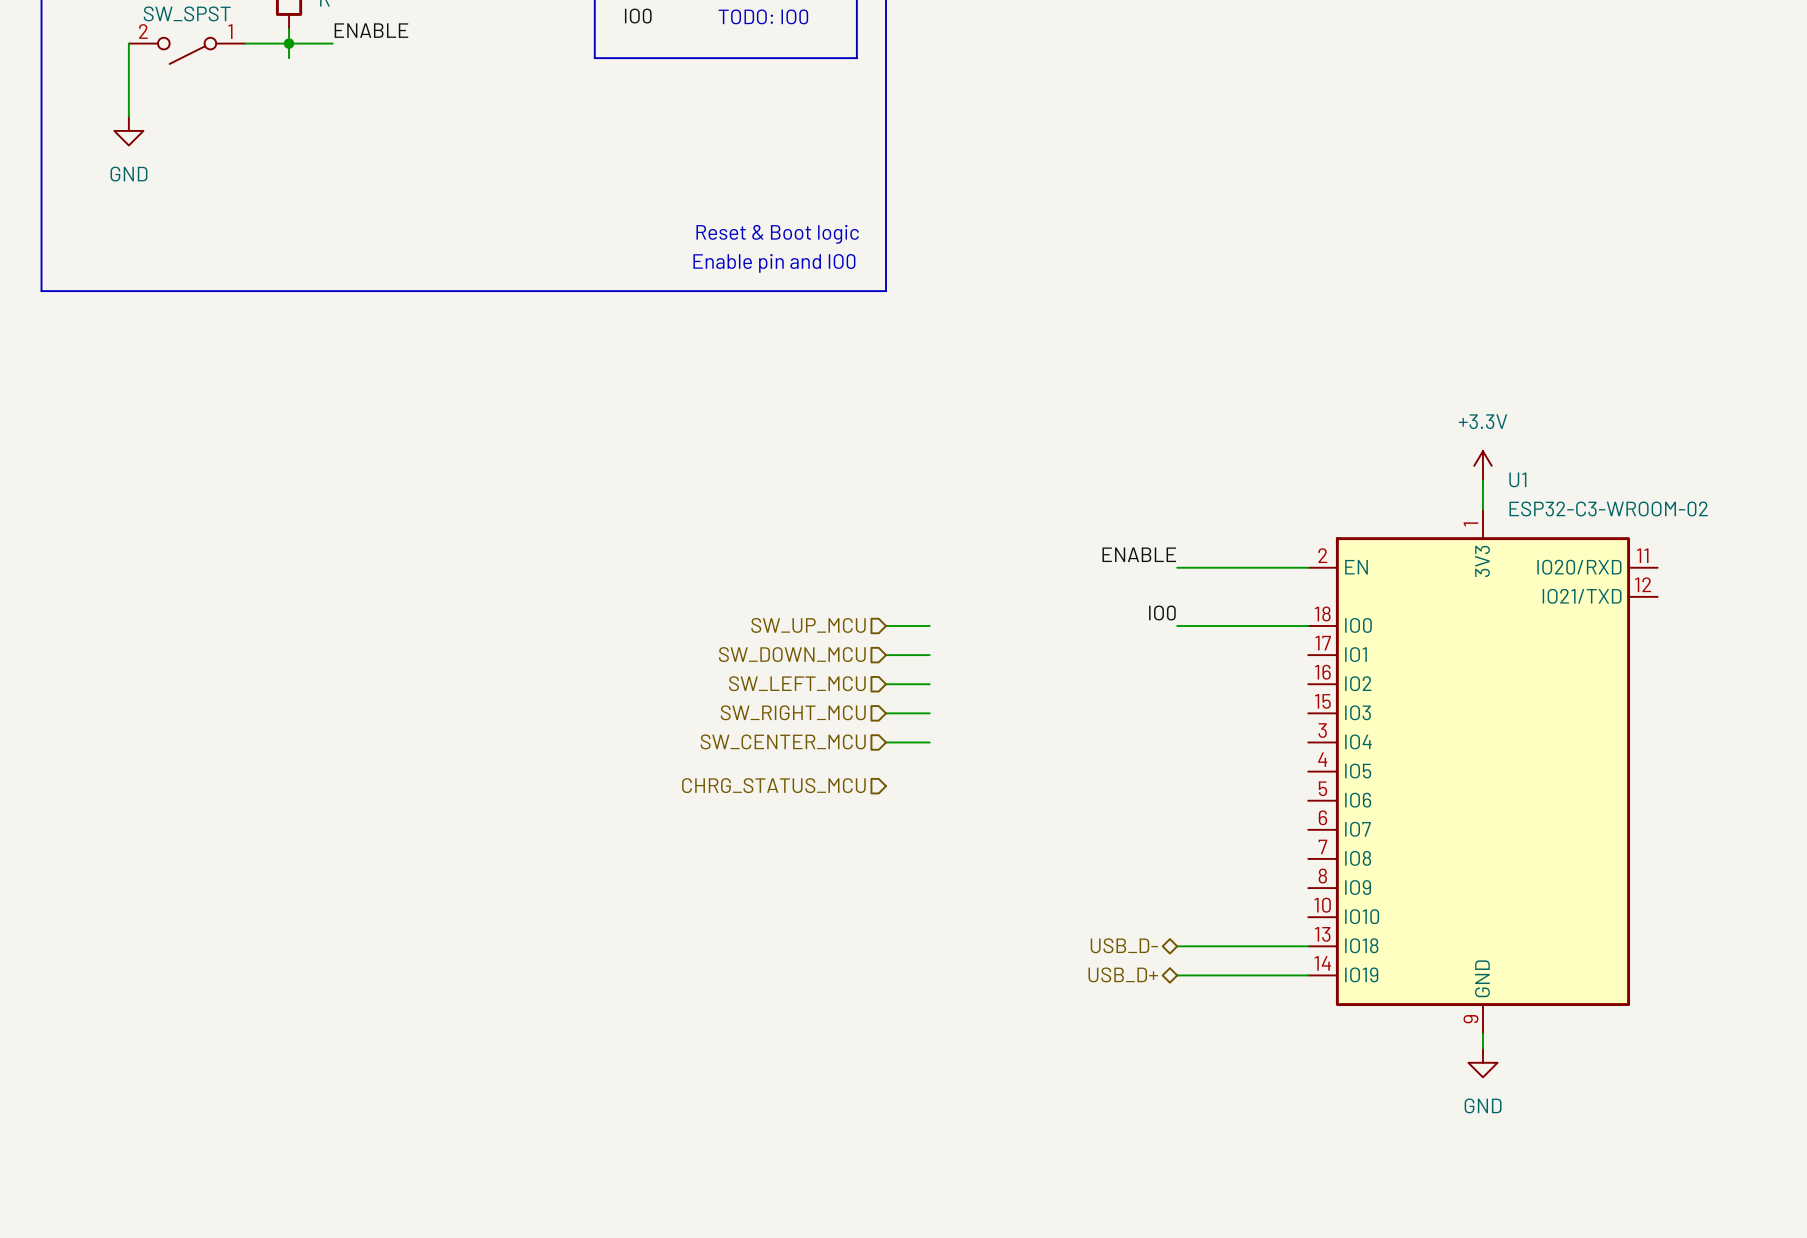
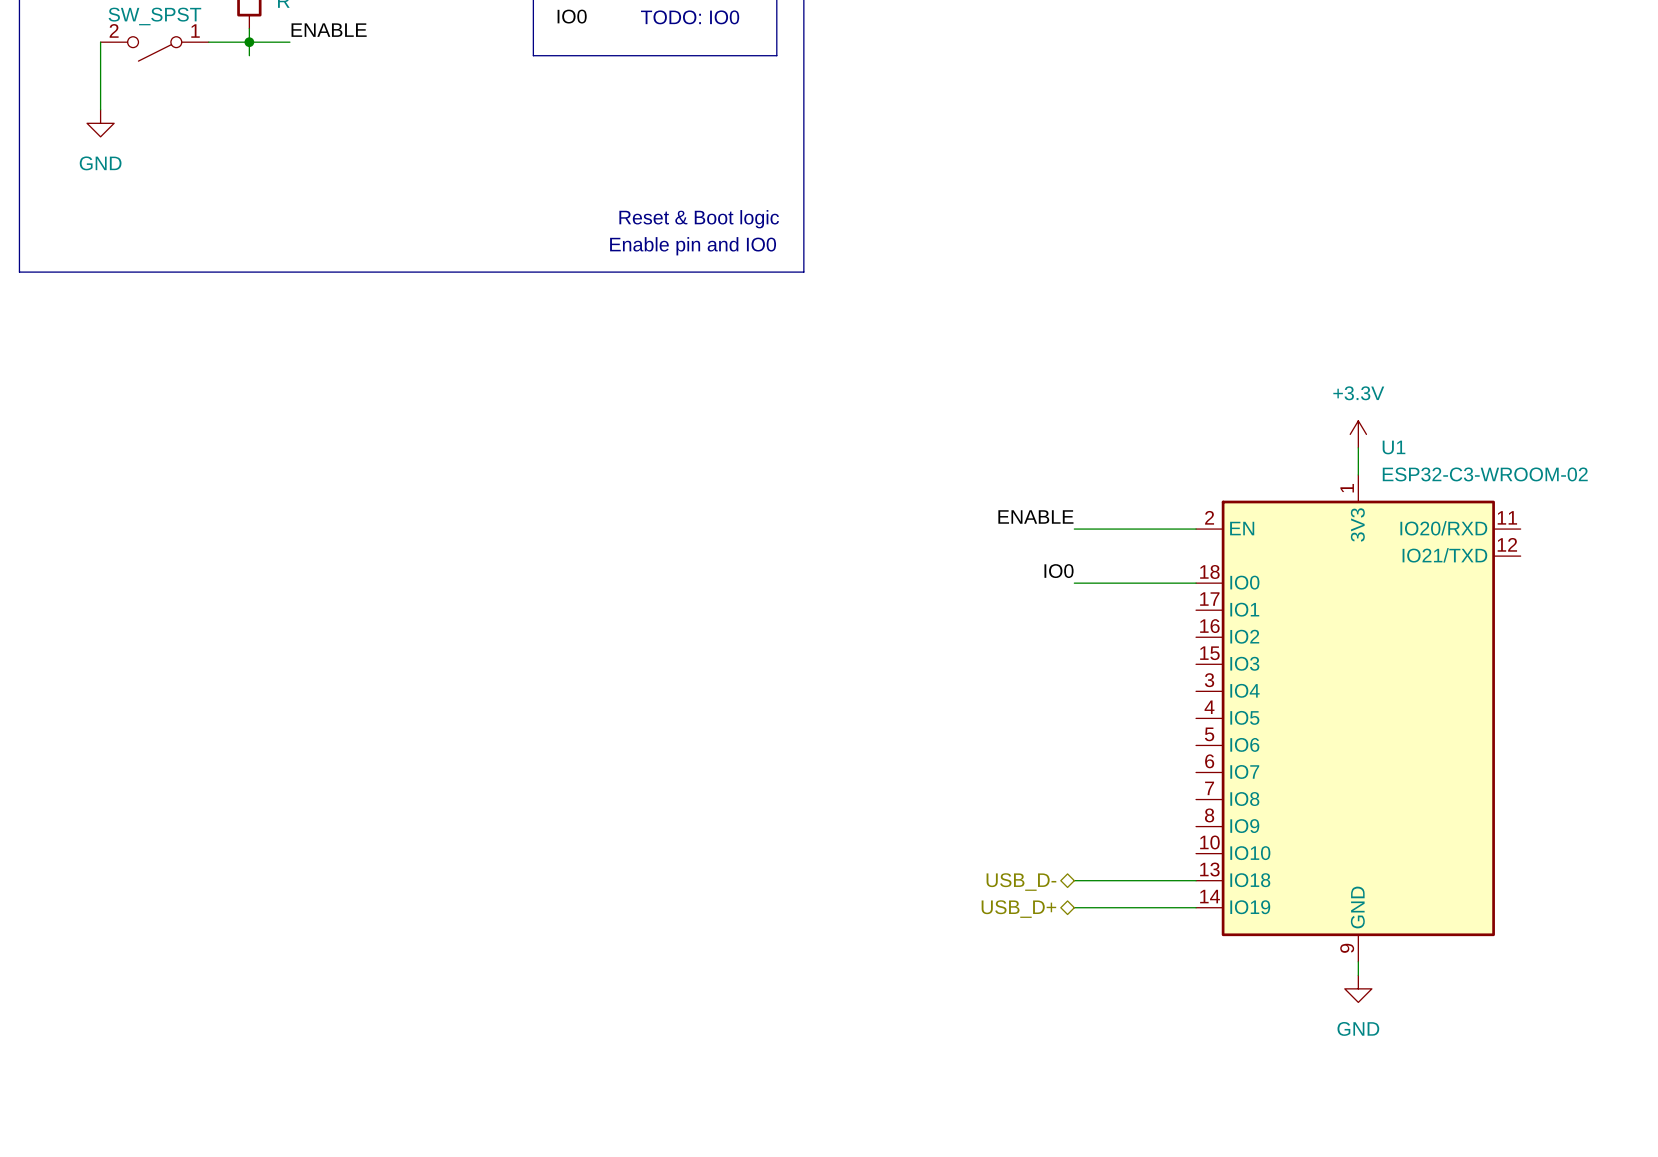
hierarchical label: SW_UP_MCU (808, 625) -> none
wire: (886, 625) (929, 625) -> none
hierarchical label: SW_DOWN_MCU (792, 654) -> none
wire: (886, 655) (929, 655) -> none
hierarchical label: SW_LEFT_MCU (797, 683) -> none
wire: (886, 684) (929, 684) -> none
hierarchical label: SW_RIGHT_MCU (793, 712) -> none
wire: (886, 713) (929, 713) -> none
hierarchical label: SW_CENTER_MCU (783, 741) -> none
wire: (886, 742) (929, 742) -> none
hierarchical label: CHRG_STATUS_MCU (773, 785) -> none

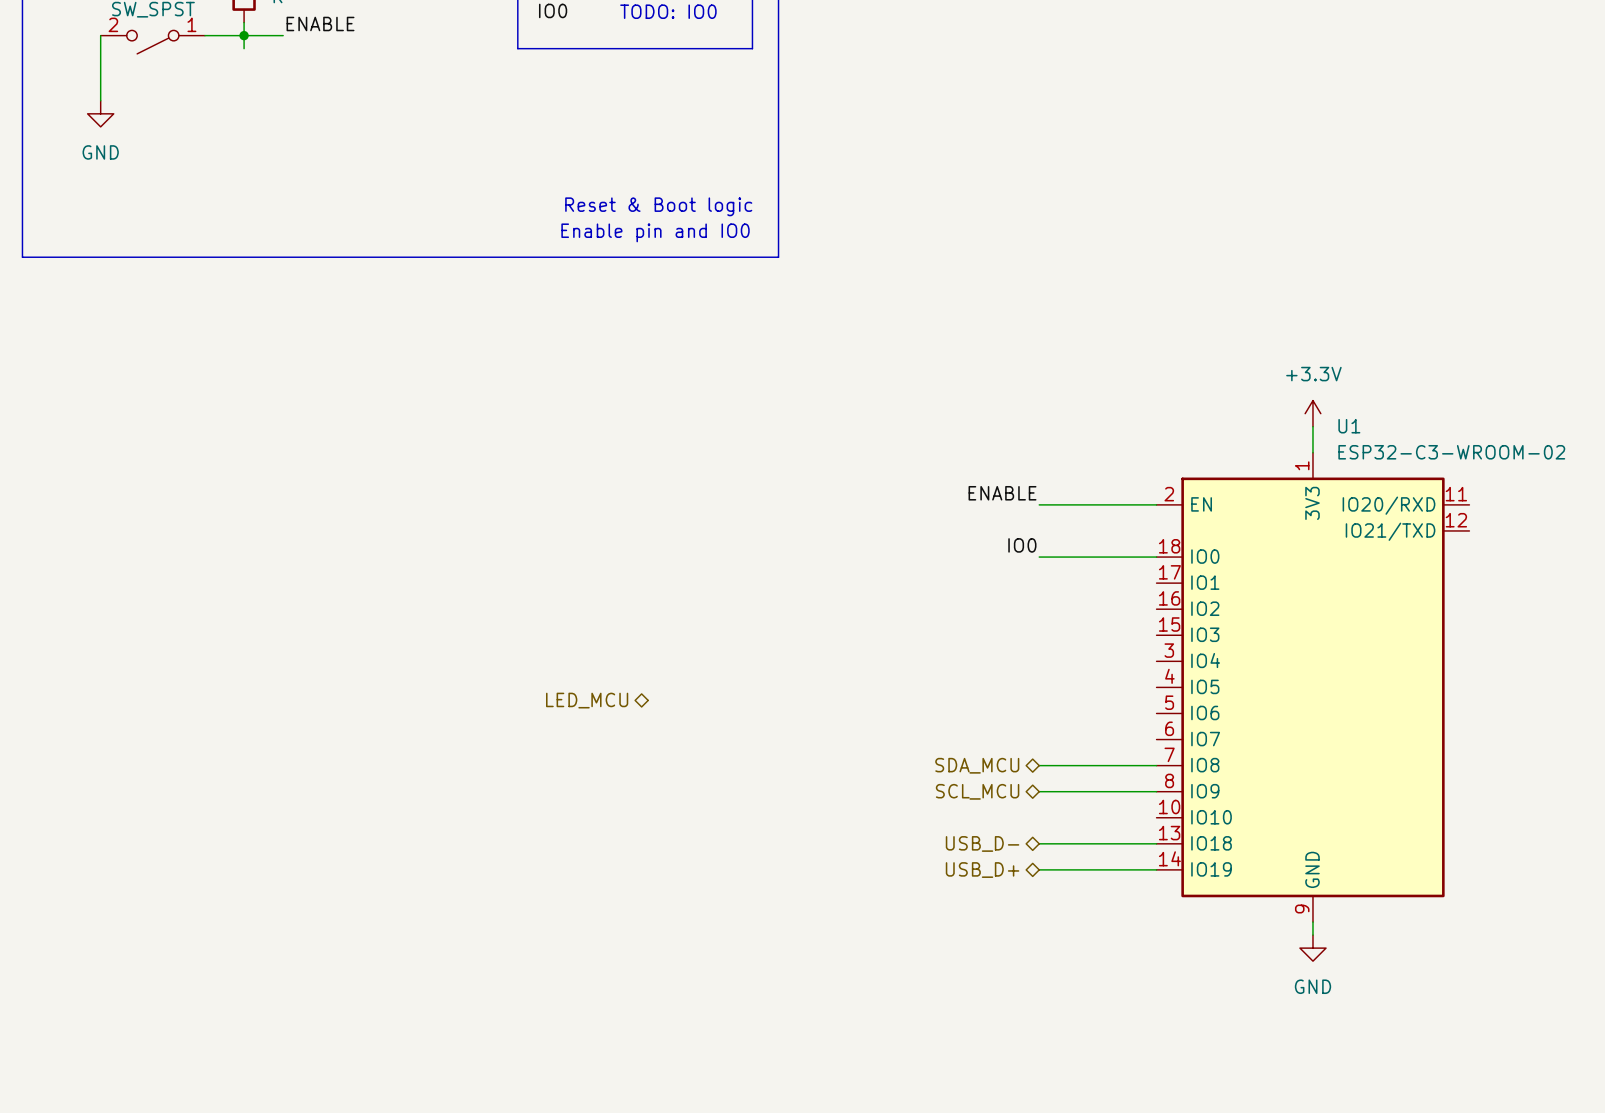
hierarchical label: none -> LED_MCU (587, 700)
wire: none -> (1039, 765) (1156, 765)
hierarchical label: none -> SDA_MCU (977, 765)
wire: none -> (1039, 791) (1156, 791)
hierarchical label: none -> SCL_MCU (977, 791)

